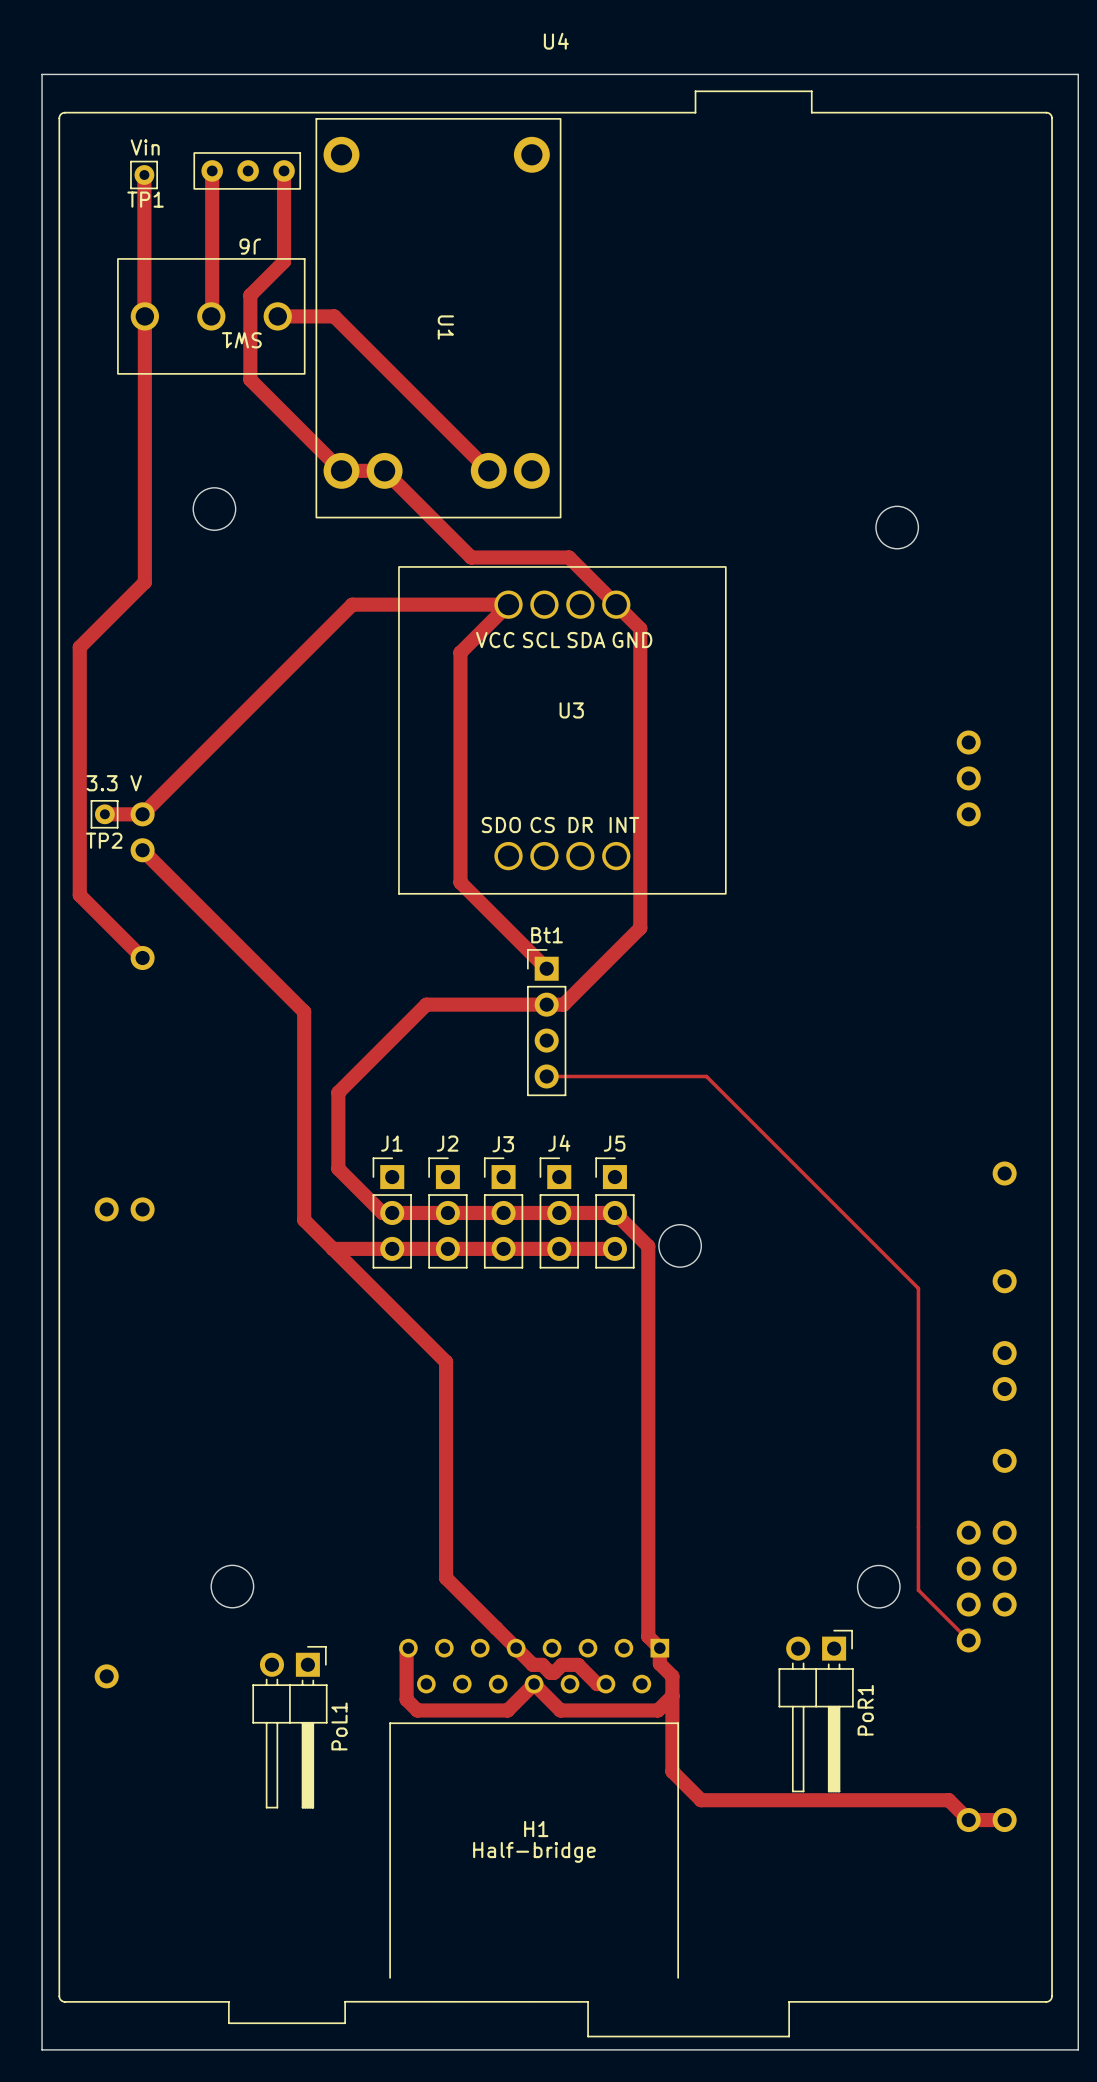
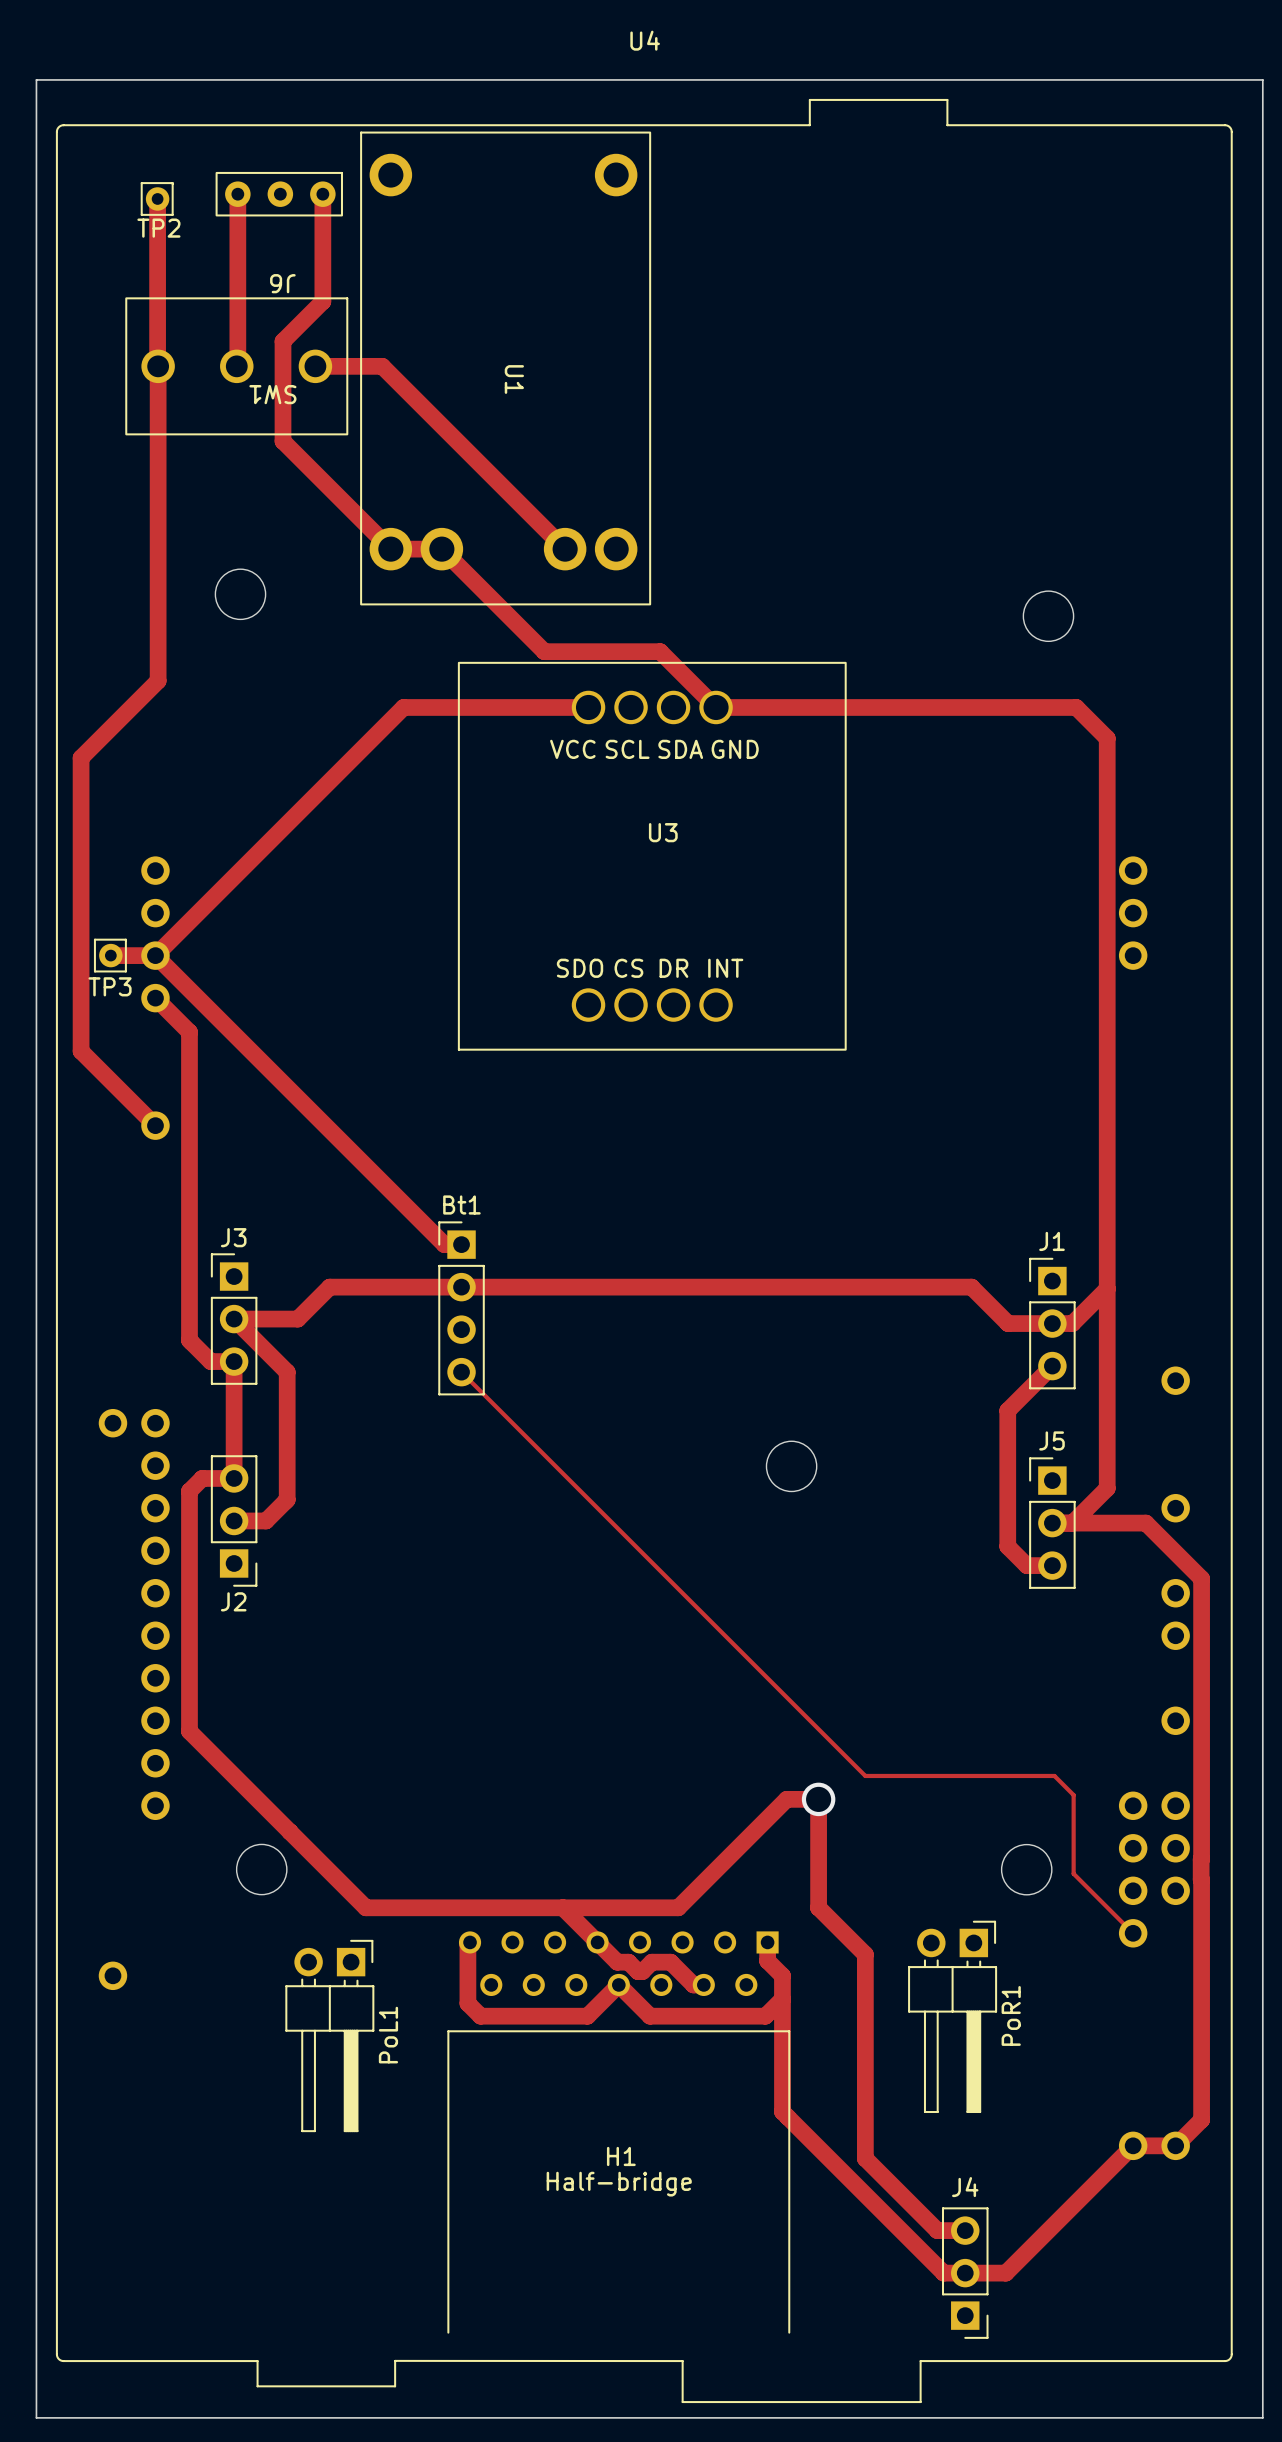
U4 footprint: [58, 90, 1053, 2038] -> [55, 98, 1233, 2404]
text: Vin (145, 147) -> none
TP1 name: TP1 (145, 199) -> TP2 (158, 228)
track: (508, 604) (460, 652) (460, 882) (546, 968) -> none
track: (616, 604) (640, 628) (640, 928) (563, 1004) (426, 1004) (338, 1092) (338, 1168) (382, 1212) (614, 1212) (648, 1246) (648, 1636) (659, 1648) -> (716, 707) (1076, 707) (1107, 738) (1107, 1488) (1072, 1523)
text: 3.3 V (114, 783) -> none
track: none -> (155, 955) (444, 1244) (461, 1244)
TP2 name: TP2 (104, 840) -> TP3 (110, 986)
track: (171, 878) (304, 1011) (304, 1220) (446, 1362) (446, 1578) (486, 1618) -> (189, 1032) (189, 1340) (210, 1361) (234, 1361) (234, 1478) (202, 1478) (189, 1491) (189, 1731) (365, 1907) (678, 1907) (786, 1799) (818, 1799) (818, 1907)
Bt1 position: (546, 1022) -> (461, 1308)
track: (546, 1076) (706, 1076) (918, 1288) (918, 1523) -> (461, 1372) (865, 1775) (1054, 1775) (1073, 1795)
track: none -> (1107, 1288) (1072, 1323) (1008, 1323) (971, 1287) (329, 1287) (297, 1319) (234, 1319) (287, 1372) (287, 1499) (266, 1520) (234, 1520)
track: none -> (1052, 1366) (1007, 1410) (1007, 1546) (1026, 1565) (1052, 1565)
J1 position: (392, 1212) -> (1052, 1323)
J2 rotation: 0° (447, 1212) -> 180° (234, 1520)
J2 position: (447, 1212) -> (234, 1520)
J3 position: (503, 1212) -> (234, 1319)
J4 rotation: 0° (559, 1212) -> 180° (965, 2273)
J4 position: (559, 1212) -> (965, 2273)
J5 position: (614, 1212) -> (1052, 1523)
track: (332, 1248) (614, 1248) -> none
track: none -> (1052, 1523) (1145, 1523) (1201, 1578) (1201, 2119) (1175, 2145)
via: none -> (818, 1799)
track: none -> (818, 1907) (865, 1954) (865, 2158) (937, 2230) (965, 2230)
track: (672, 1771) (701, 1800) (948, 1800) (968, 1820) -> (782, 2088) (782, 2111) (943, 2273) (1005, 2273) (1133, 2145)

